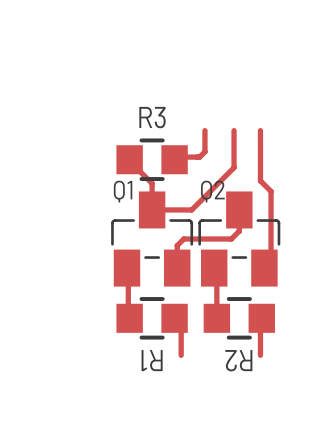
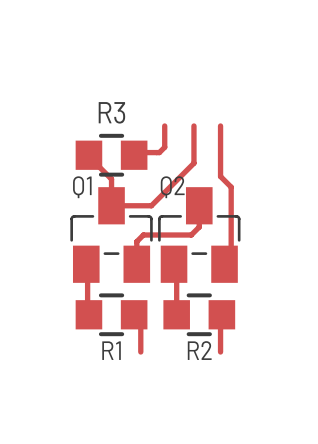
R1 name rotation: 0° (152, 360) -> 180° (111, 350)
R2 name rotation: 0° (238, 360) -> 180° (199, 350)

